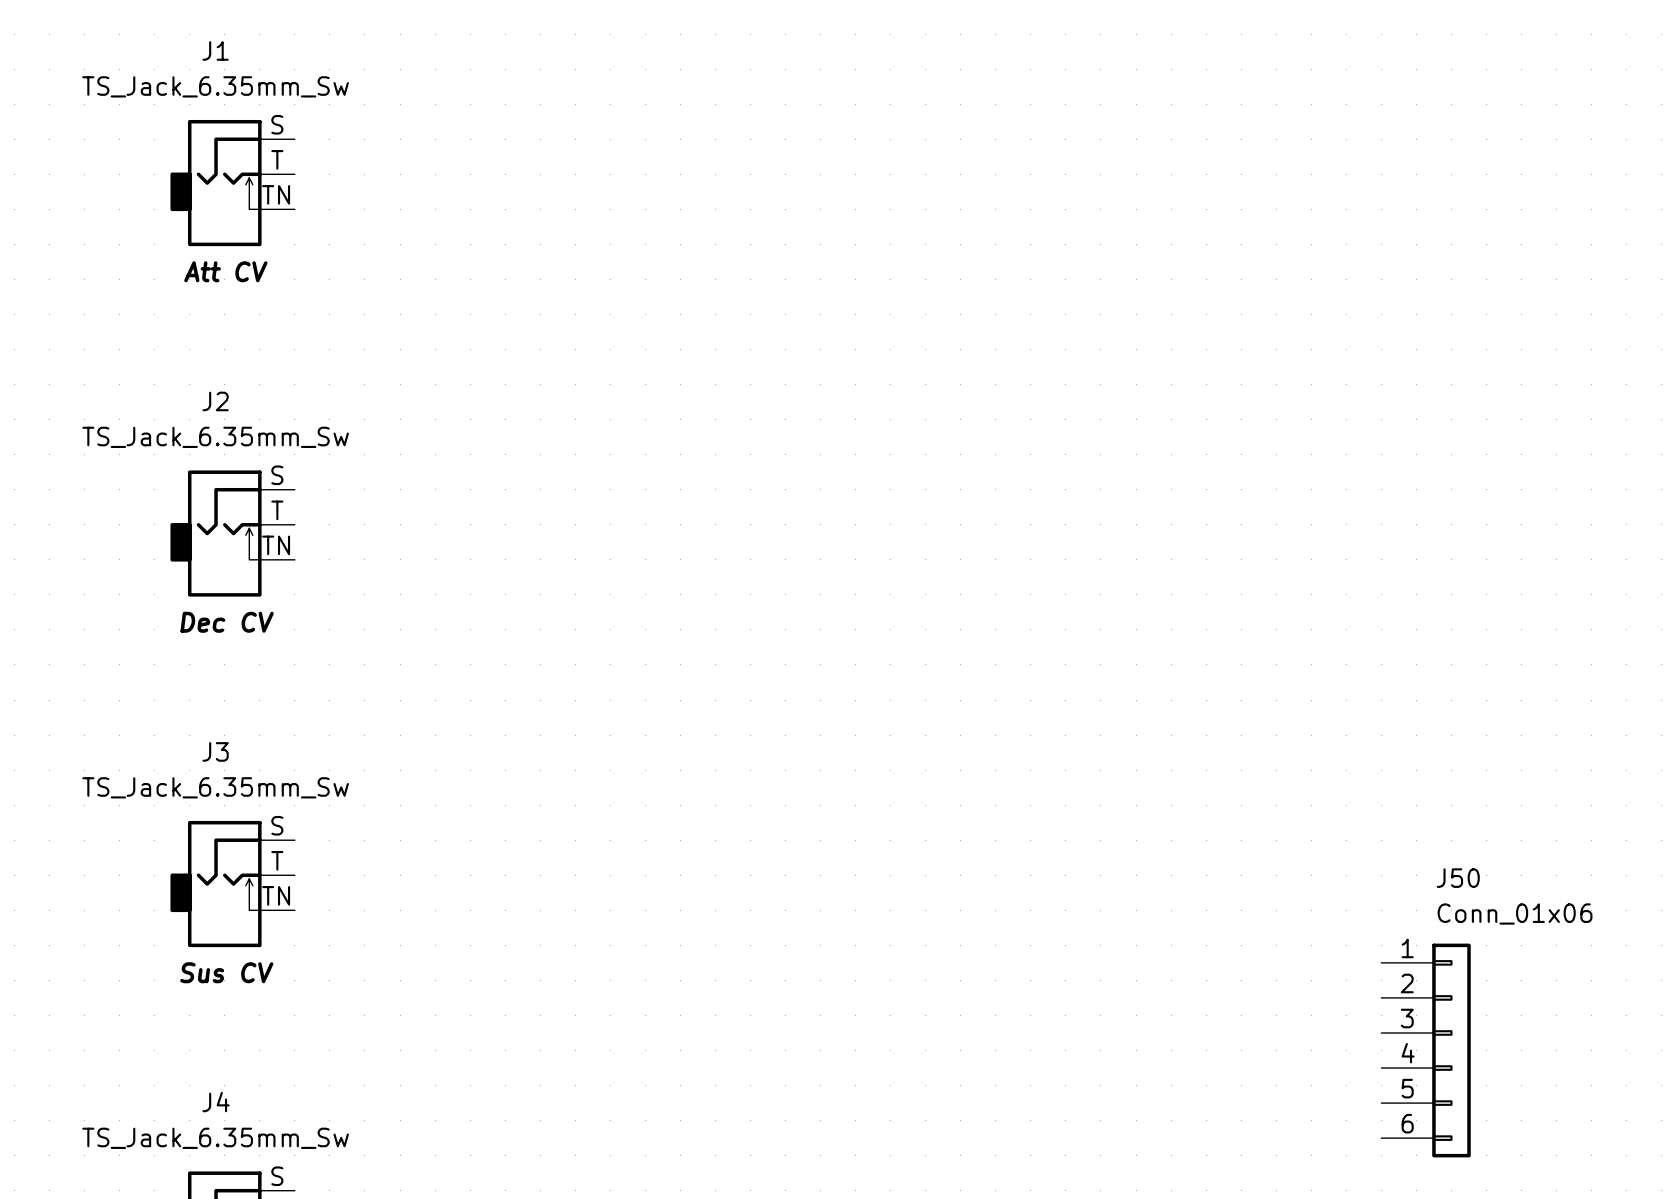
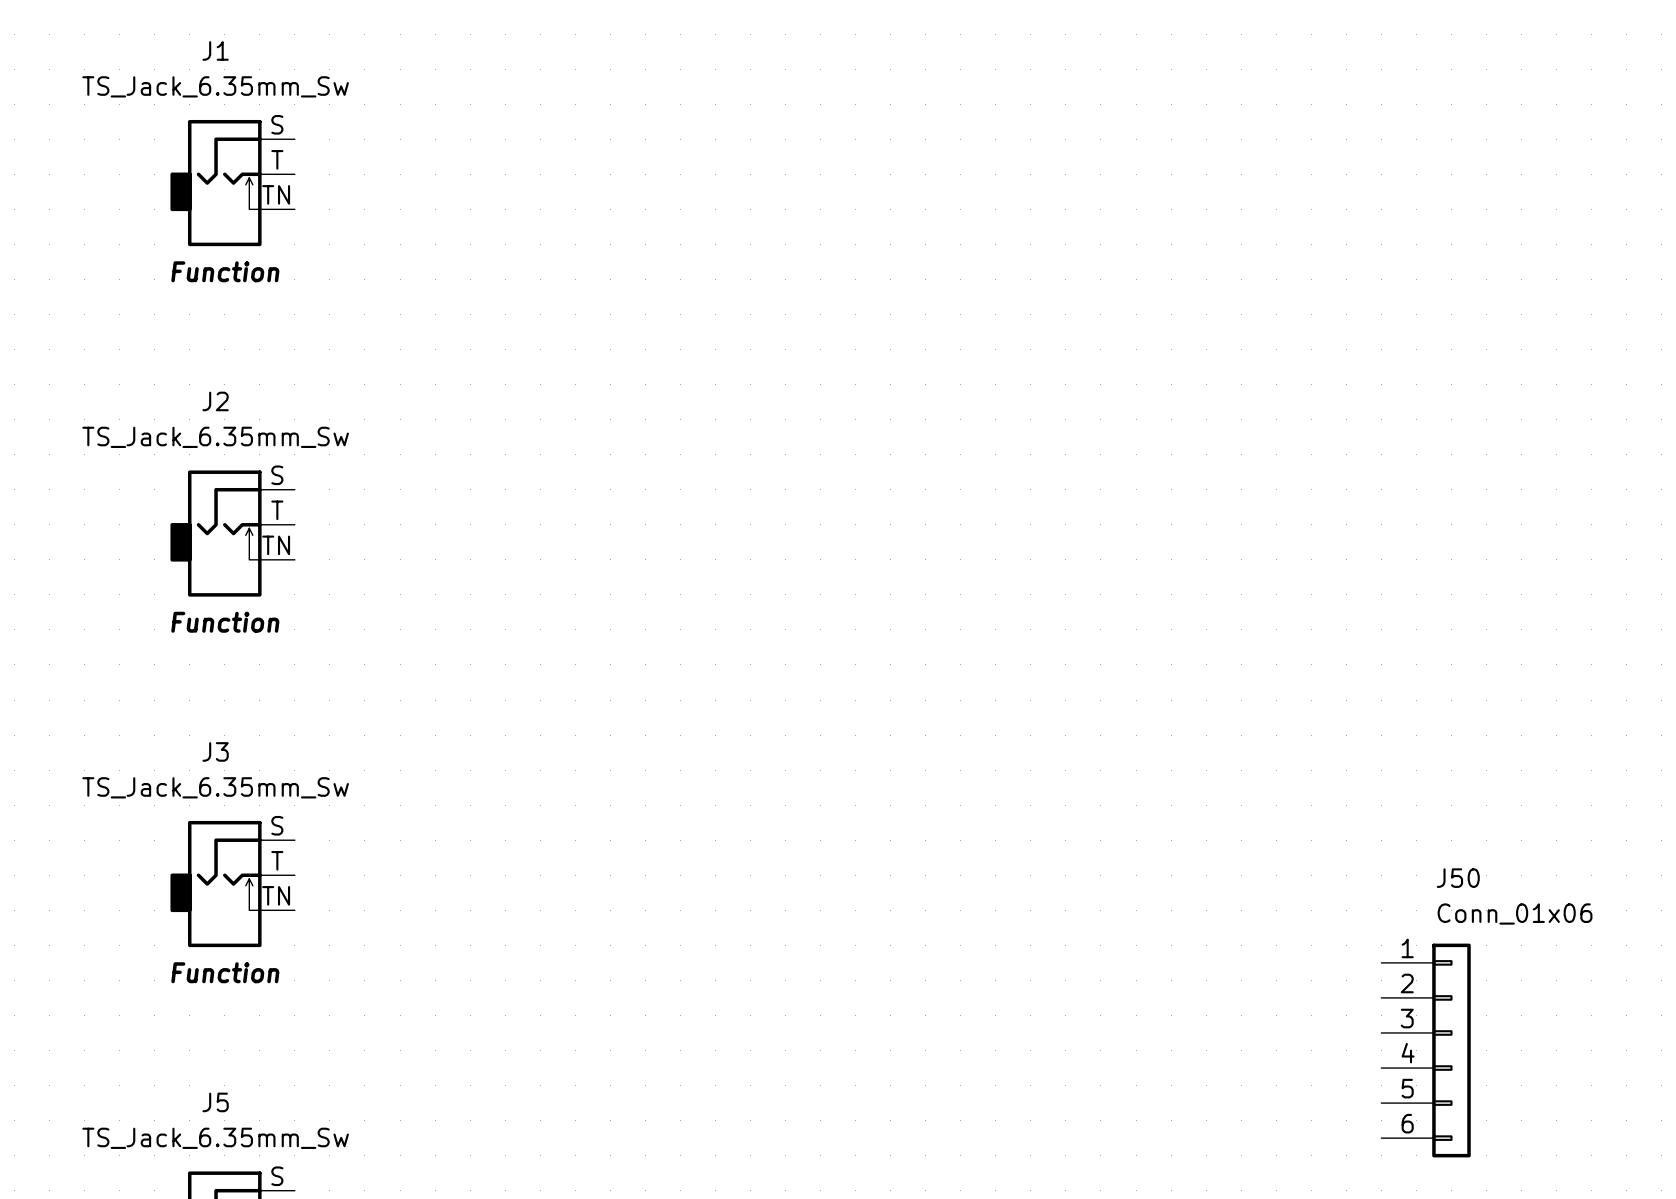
J1 text: Att CV (225, 271) -> Function (225, 271)
J2 text: Dec CV (227, 622) -> Function (225, 622)
J3 text: Sus CV (226, 972) -> Function (225, 972)
J4 name: J4 (216, 1102) -> J5 (215, 1102)

